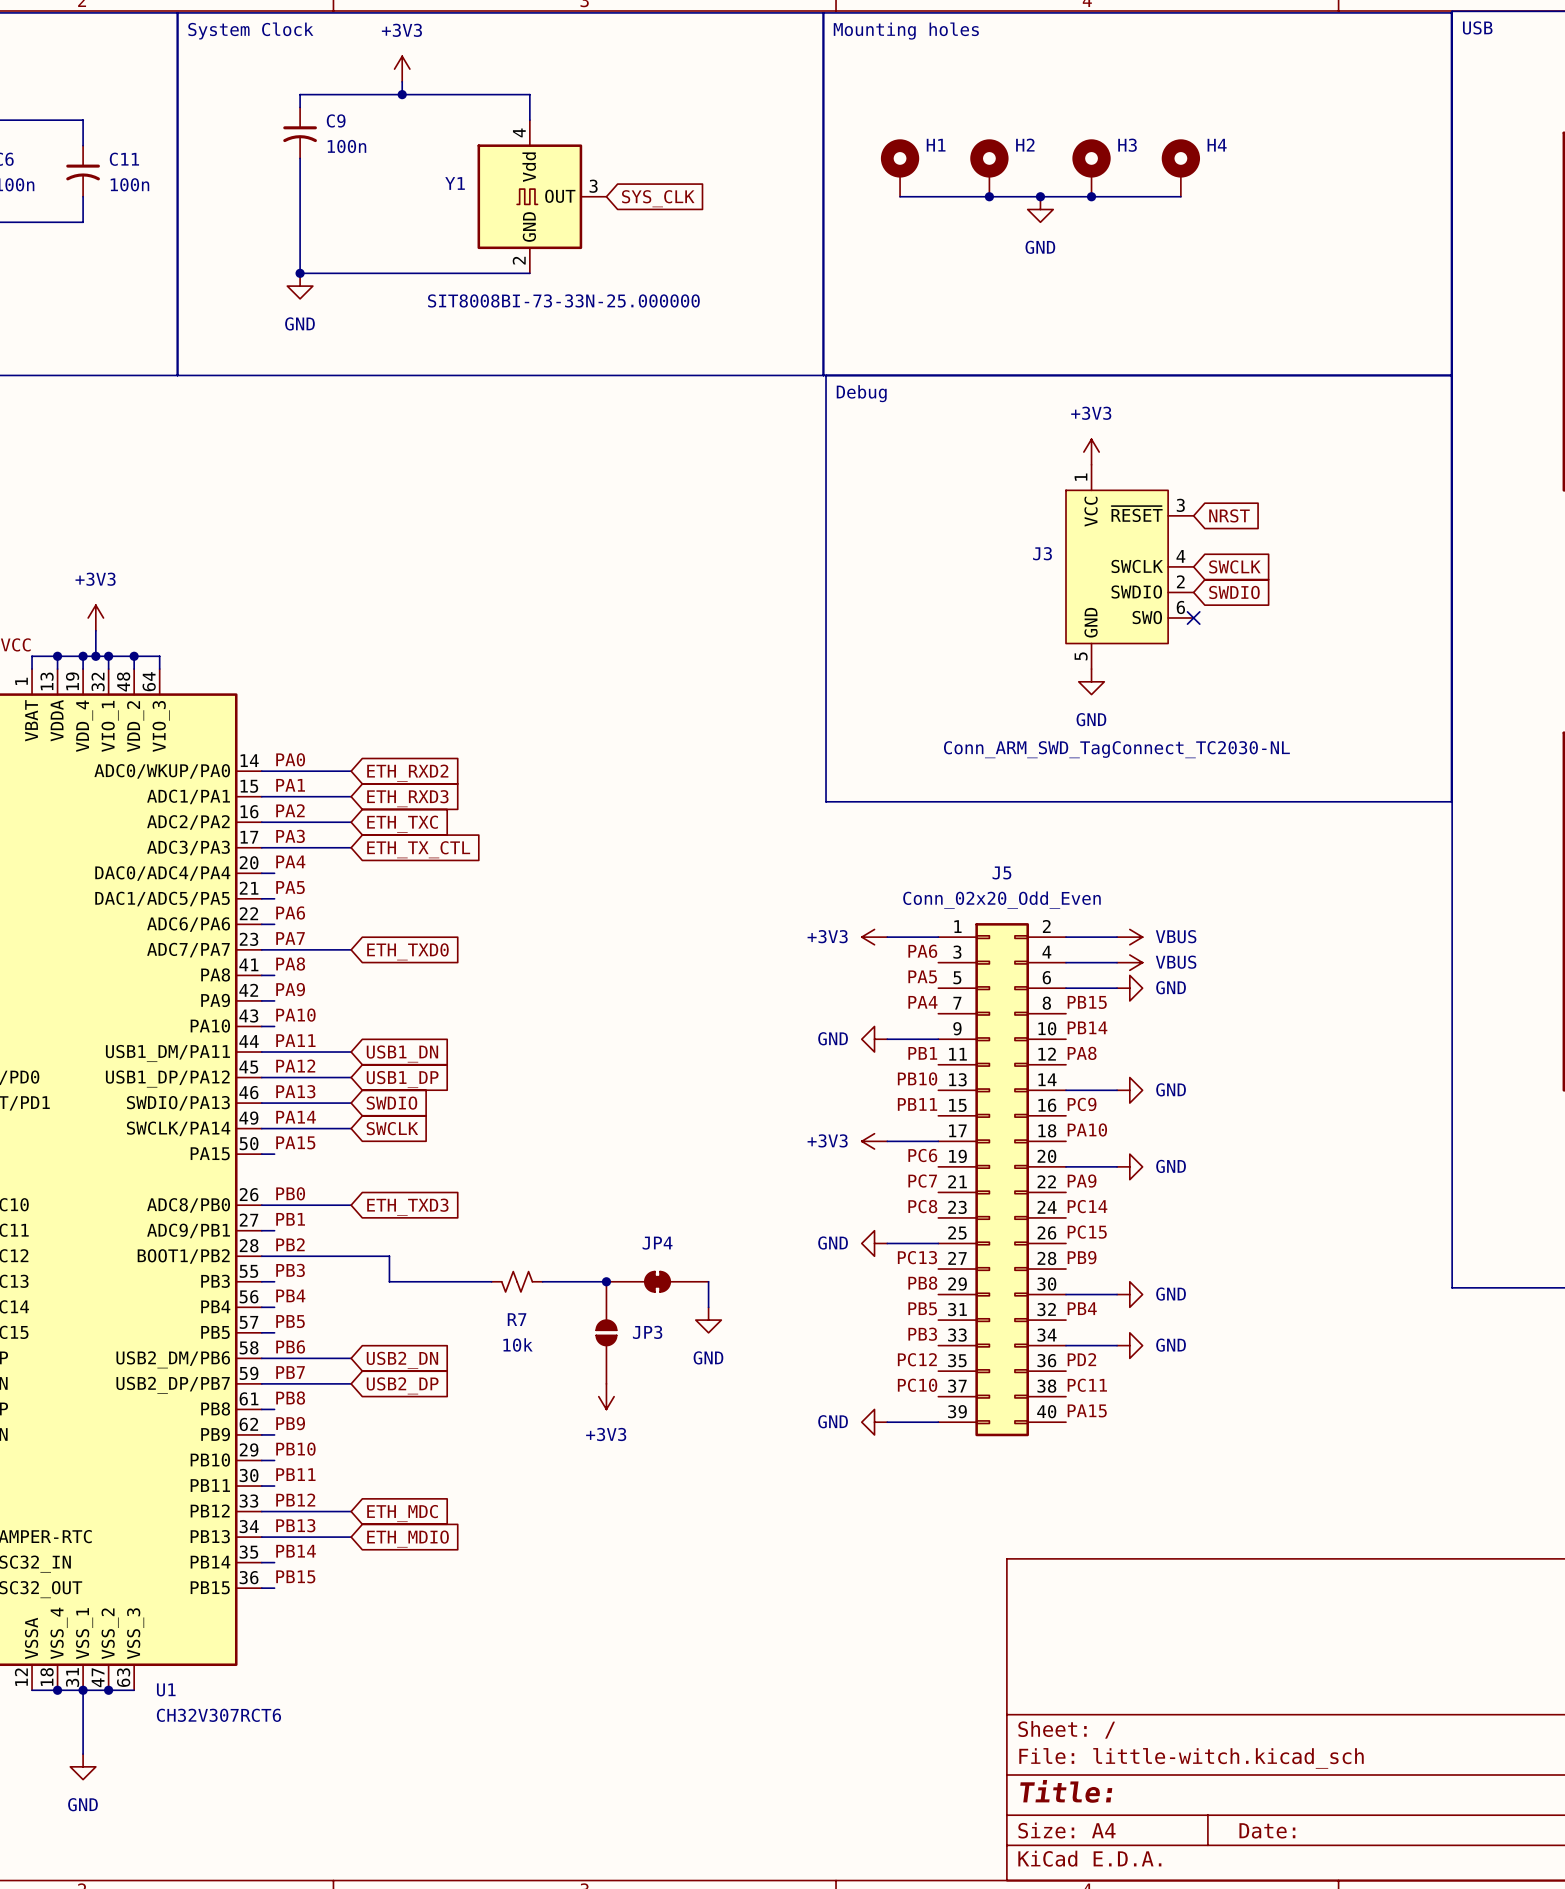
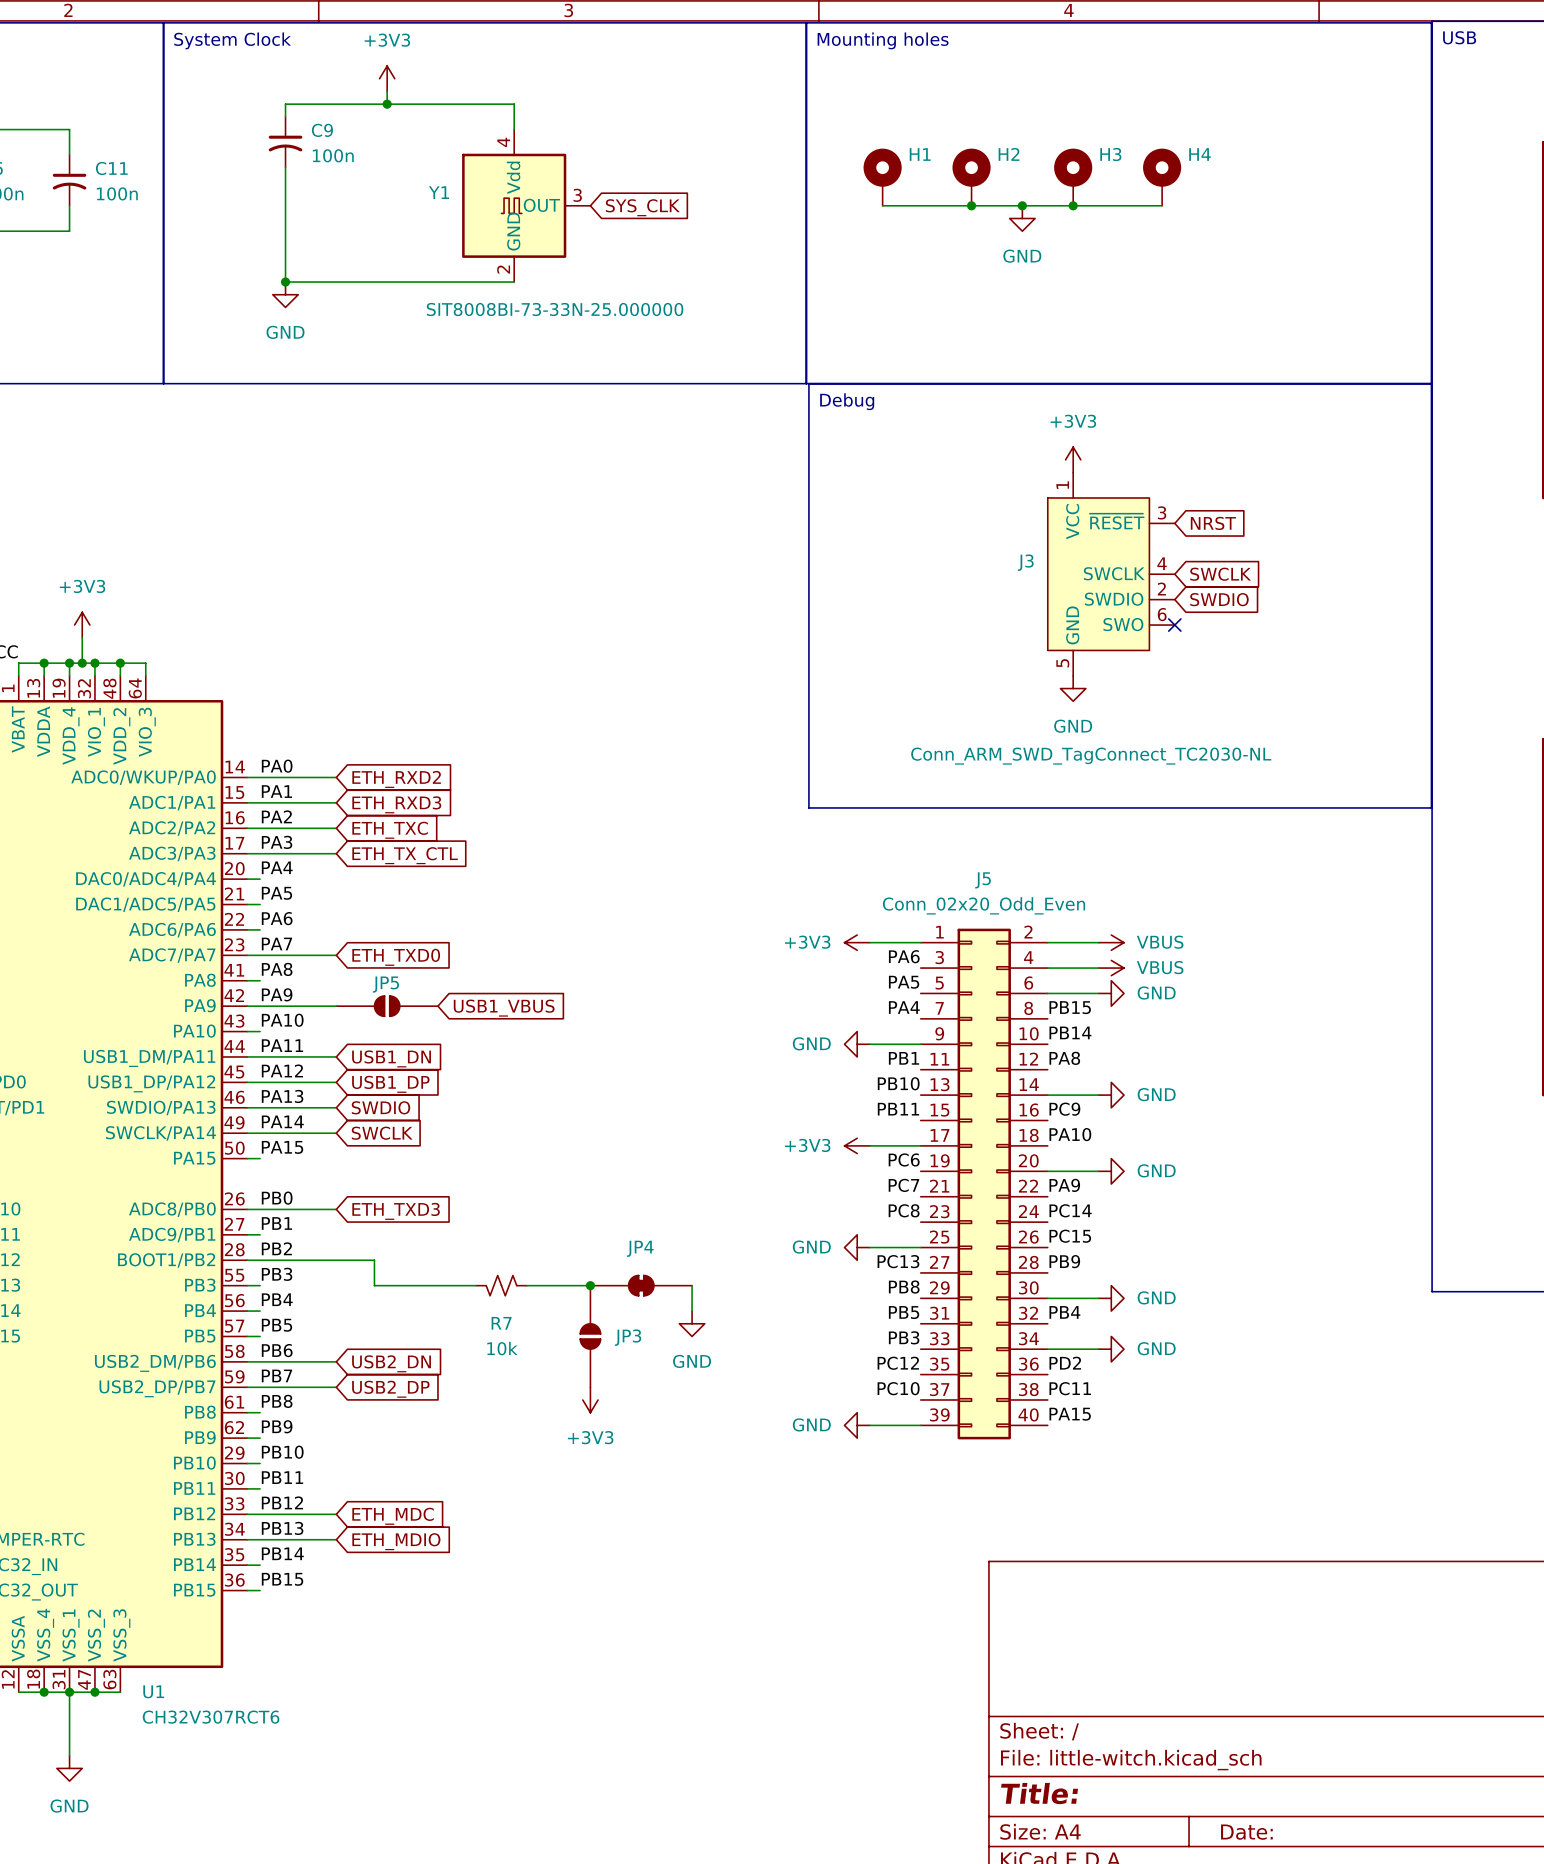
wire: none -> (260, 1006) (336, 1006)
JP5: none -> (387, 1006)
global label: none -> USB1_VBUS (504, 1008)

